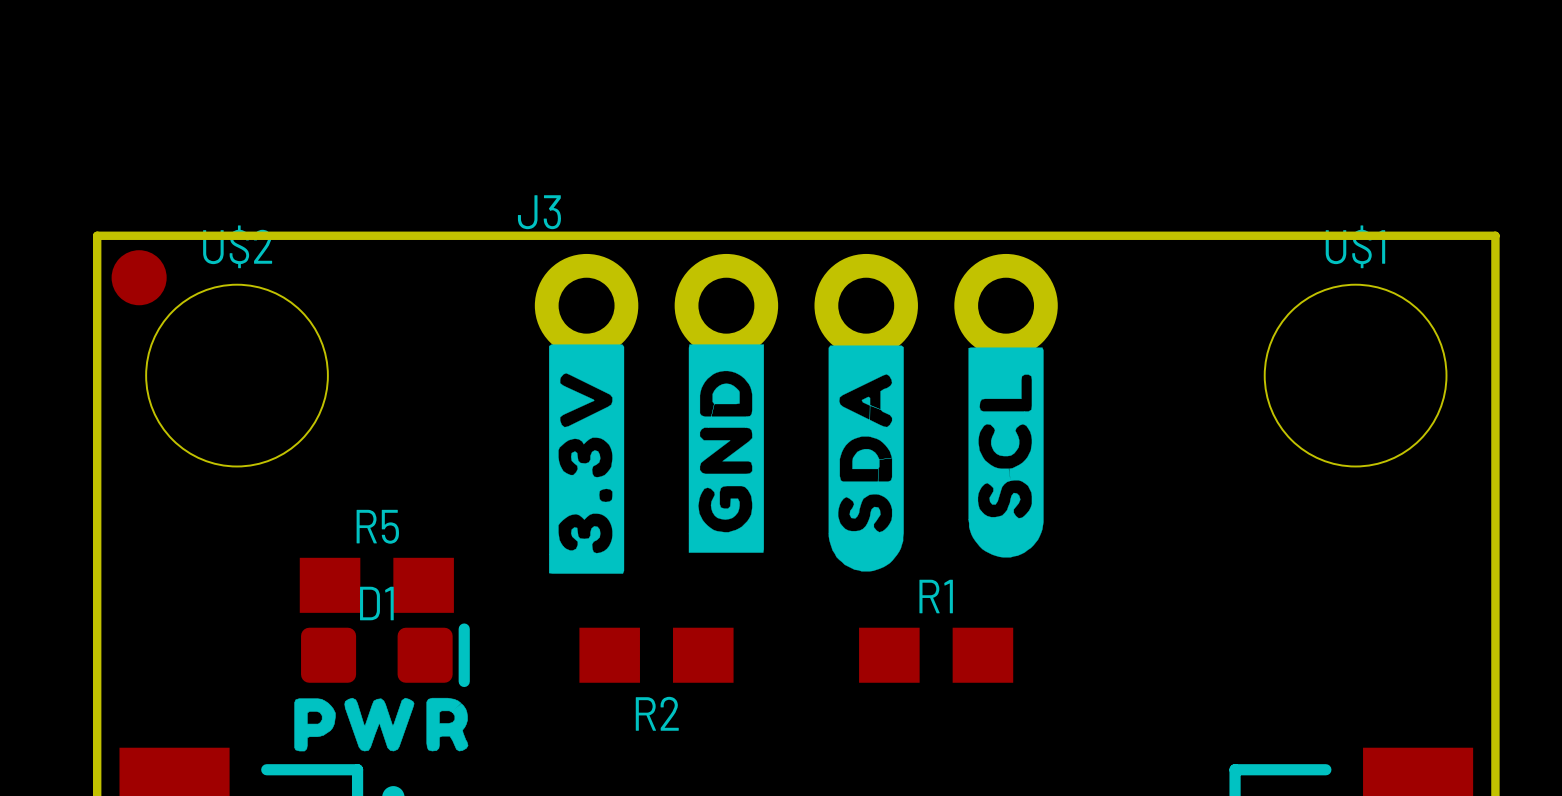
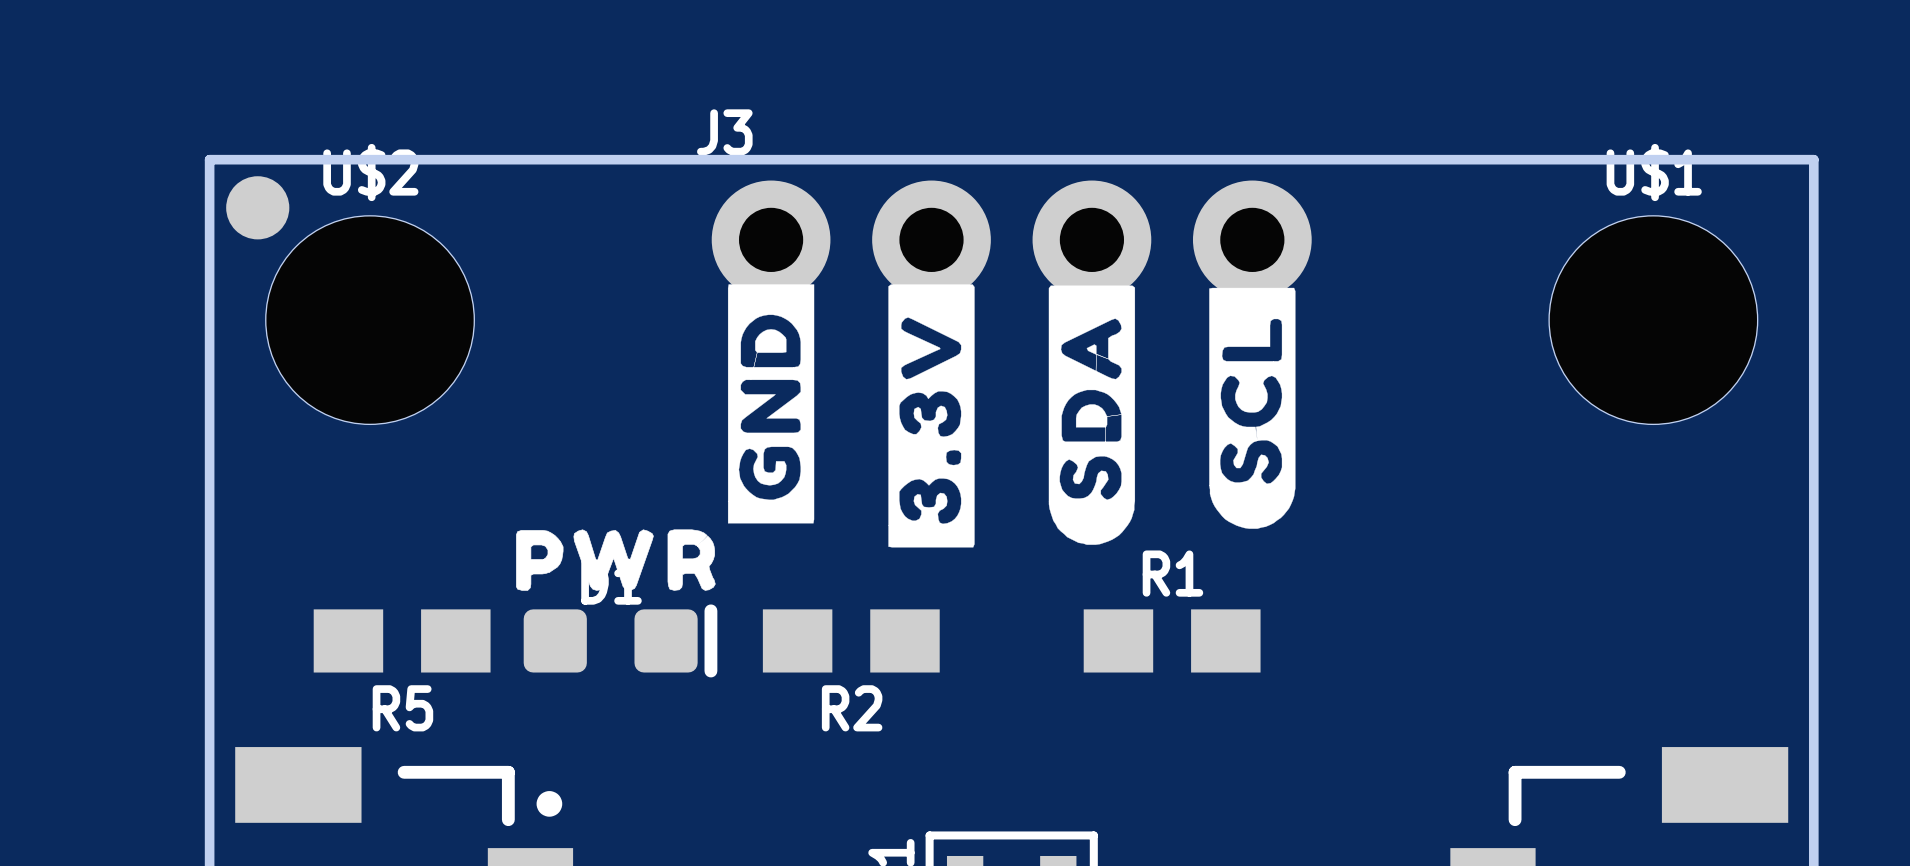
drawing position: (726, 448) -> (771, 403)
drawing position: (586, 459) -> (931, 415)
R5 name position: R5 (377, 526) -> R5 (402, 708)
R5 position: (376, 585) -> (402, 640)
D1 position: (385, 655) -> (620, 640)
drawing position: (381, 724) -> (615, 560)

